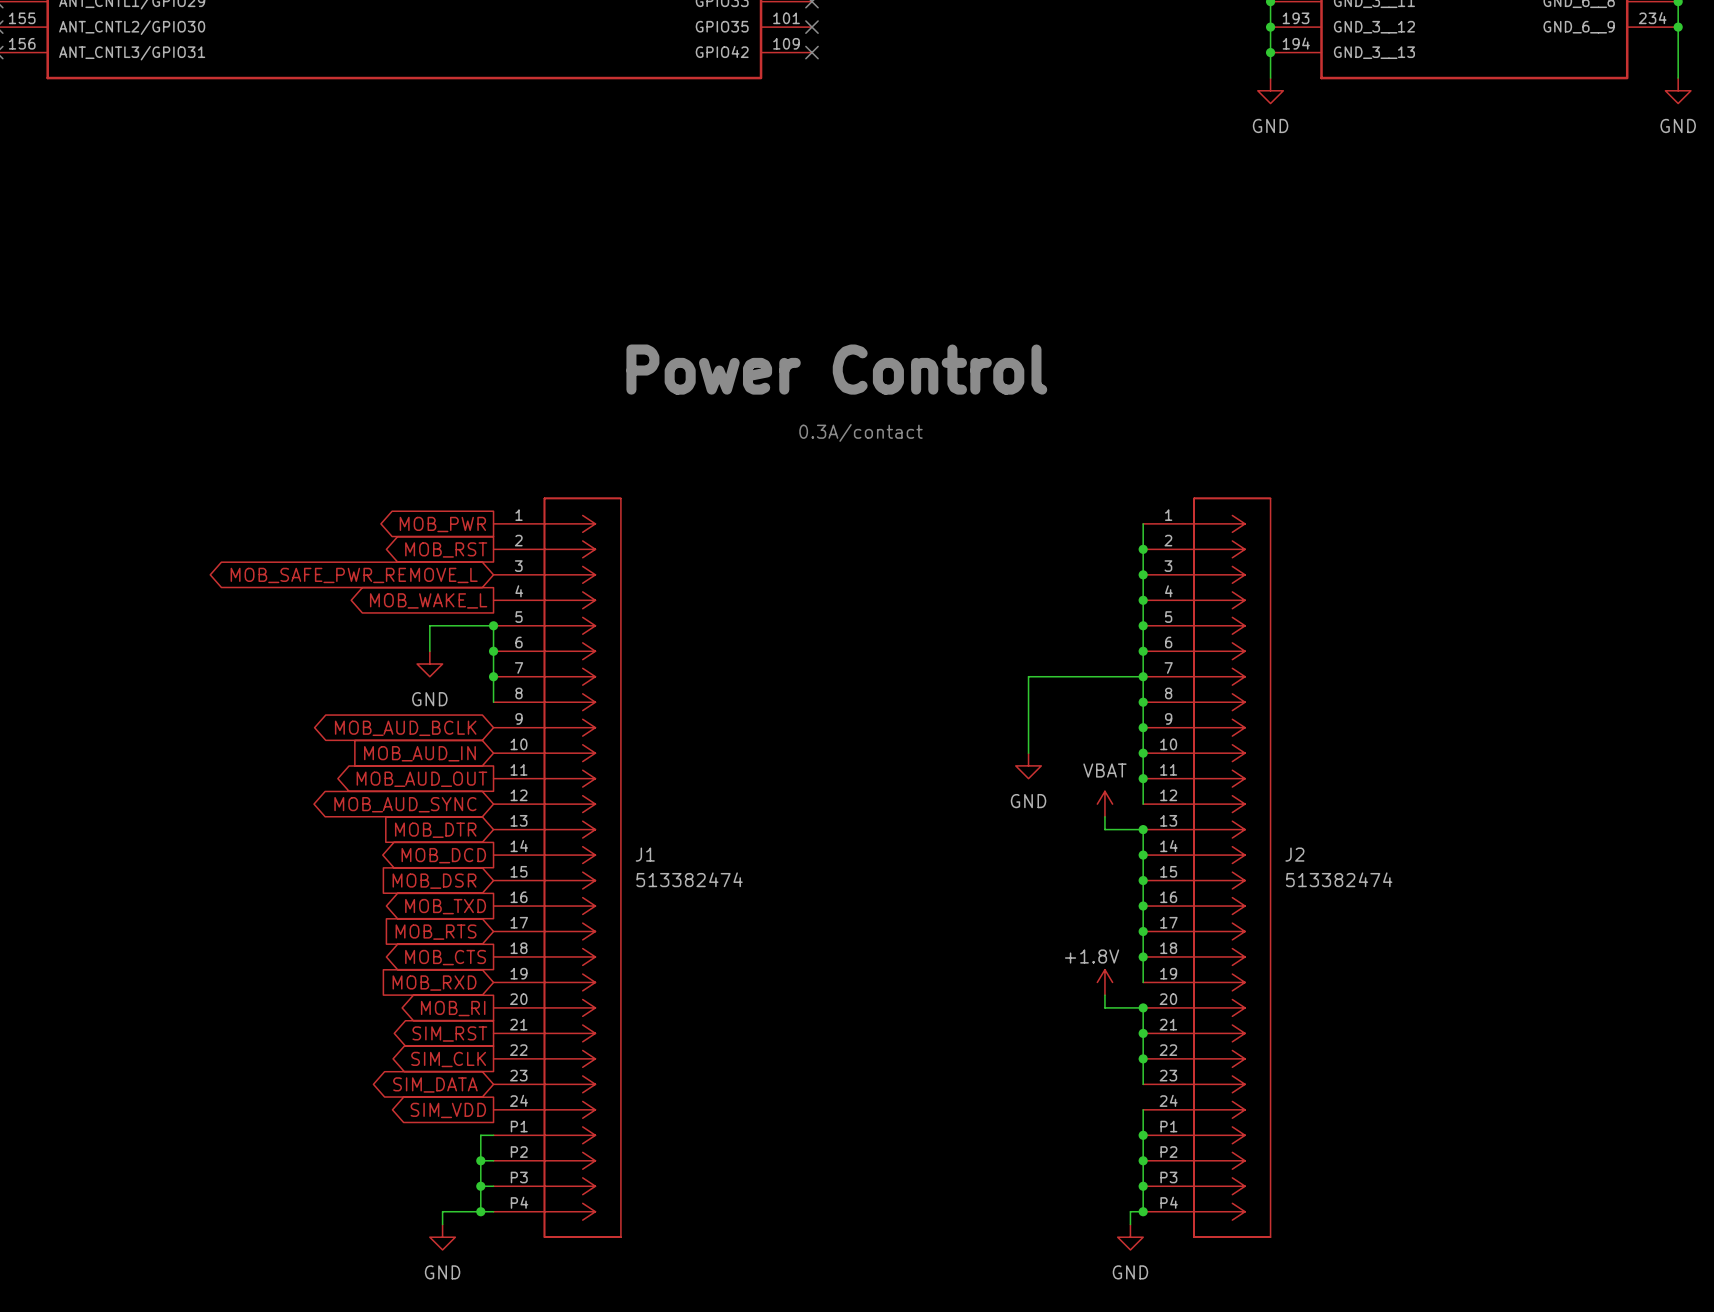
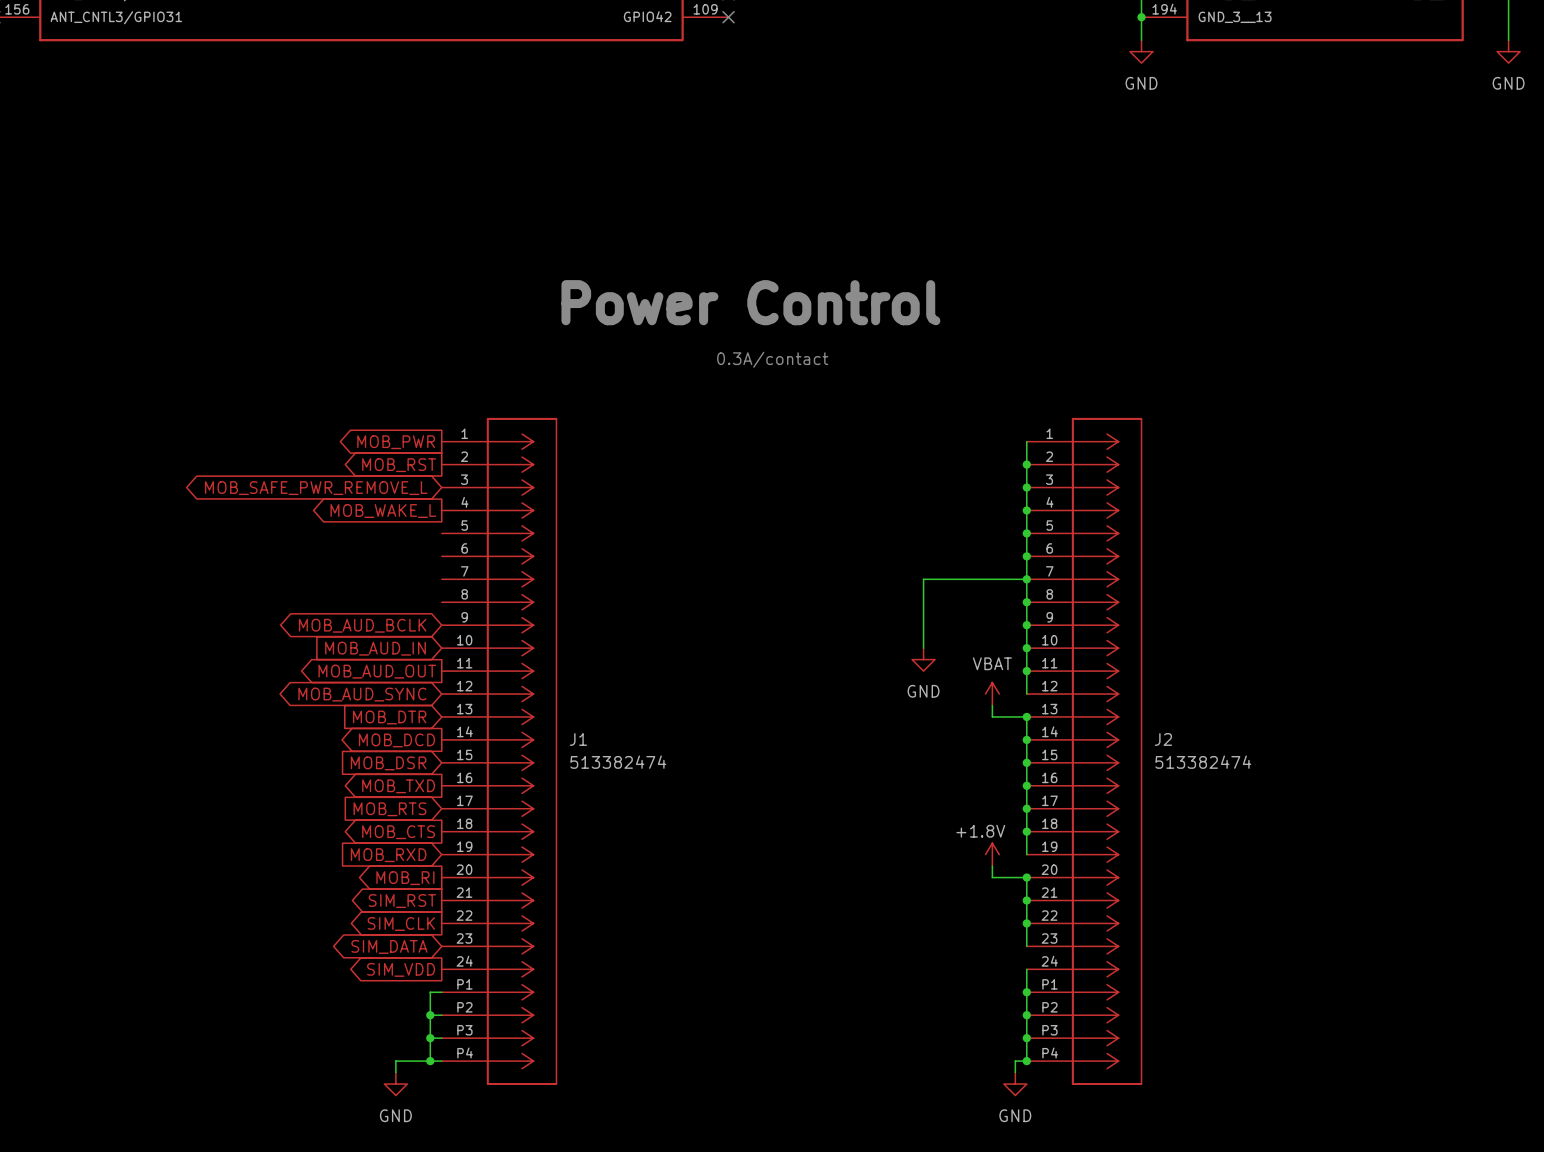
junction: (493, 625) -> none
wire: (429, 651) (429, 625) (493, 625) (493, 702) -> none
junction: (493, 651) -> none
power symbol: GND (429, 664) -> none
junction: (493, 676) -> none

